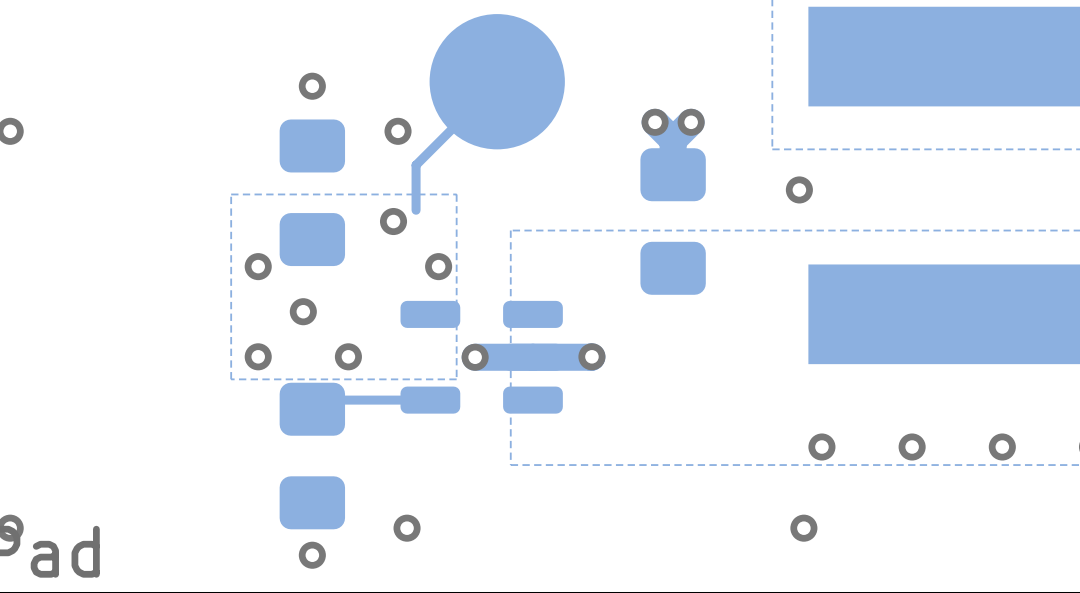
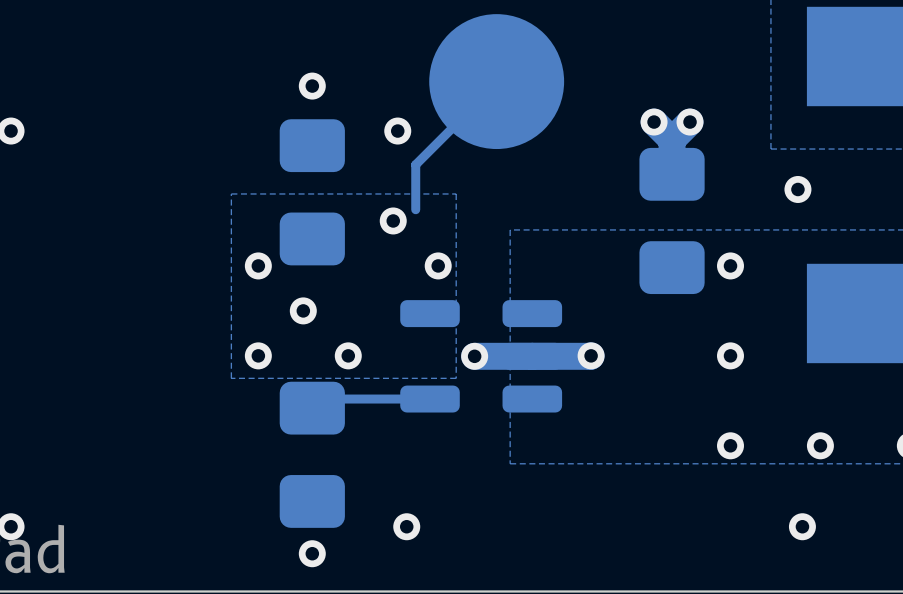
via: none -> (730, 265)
via: none -> (730, 355)
via: none -> (730, 445)

